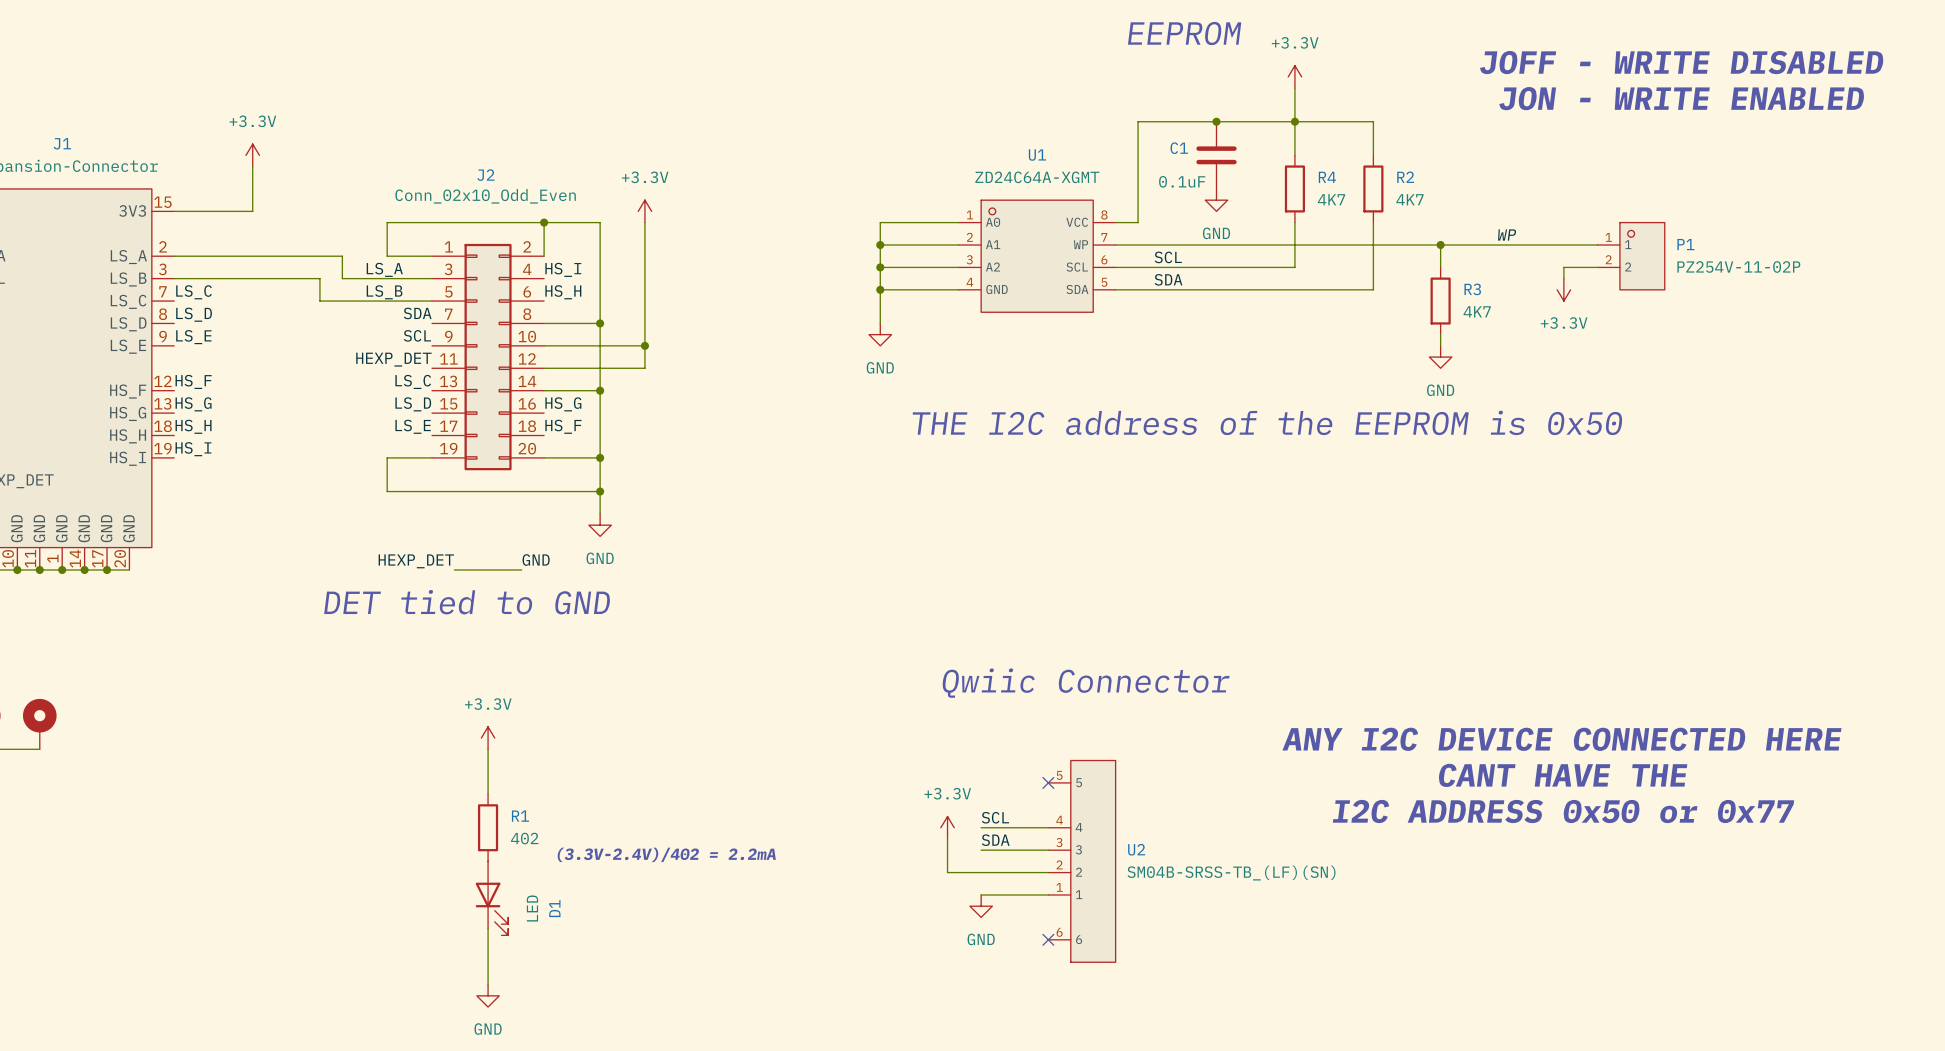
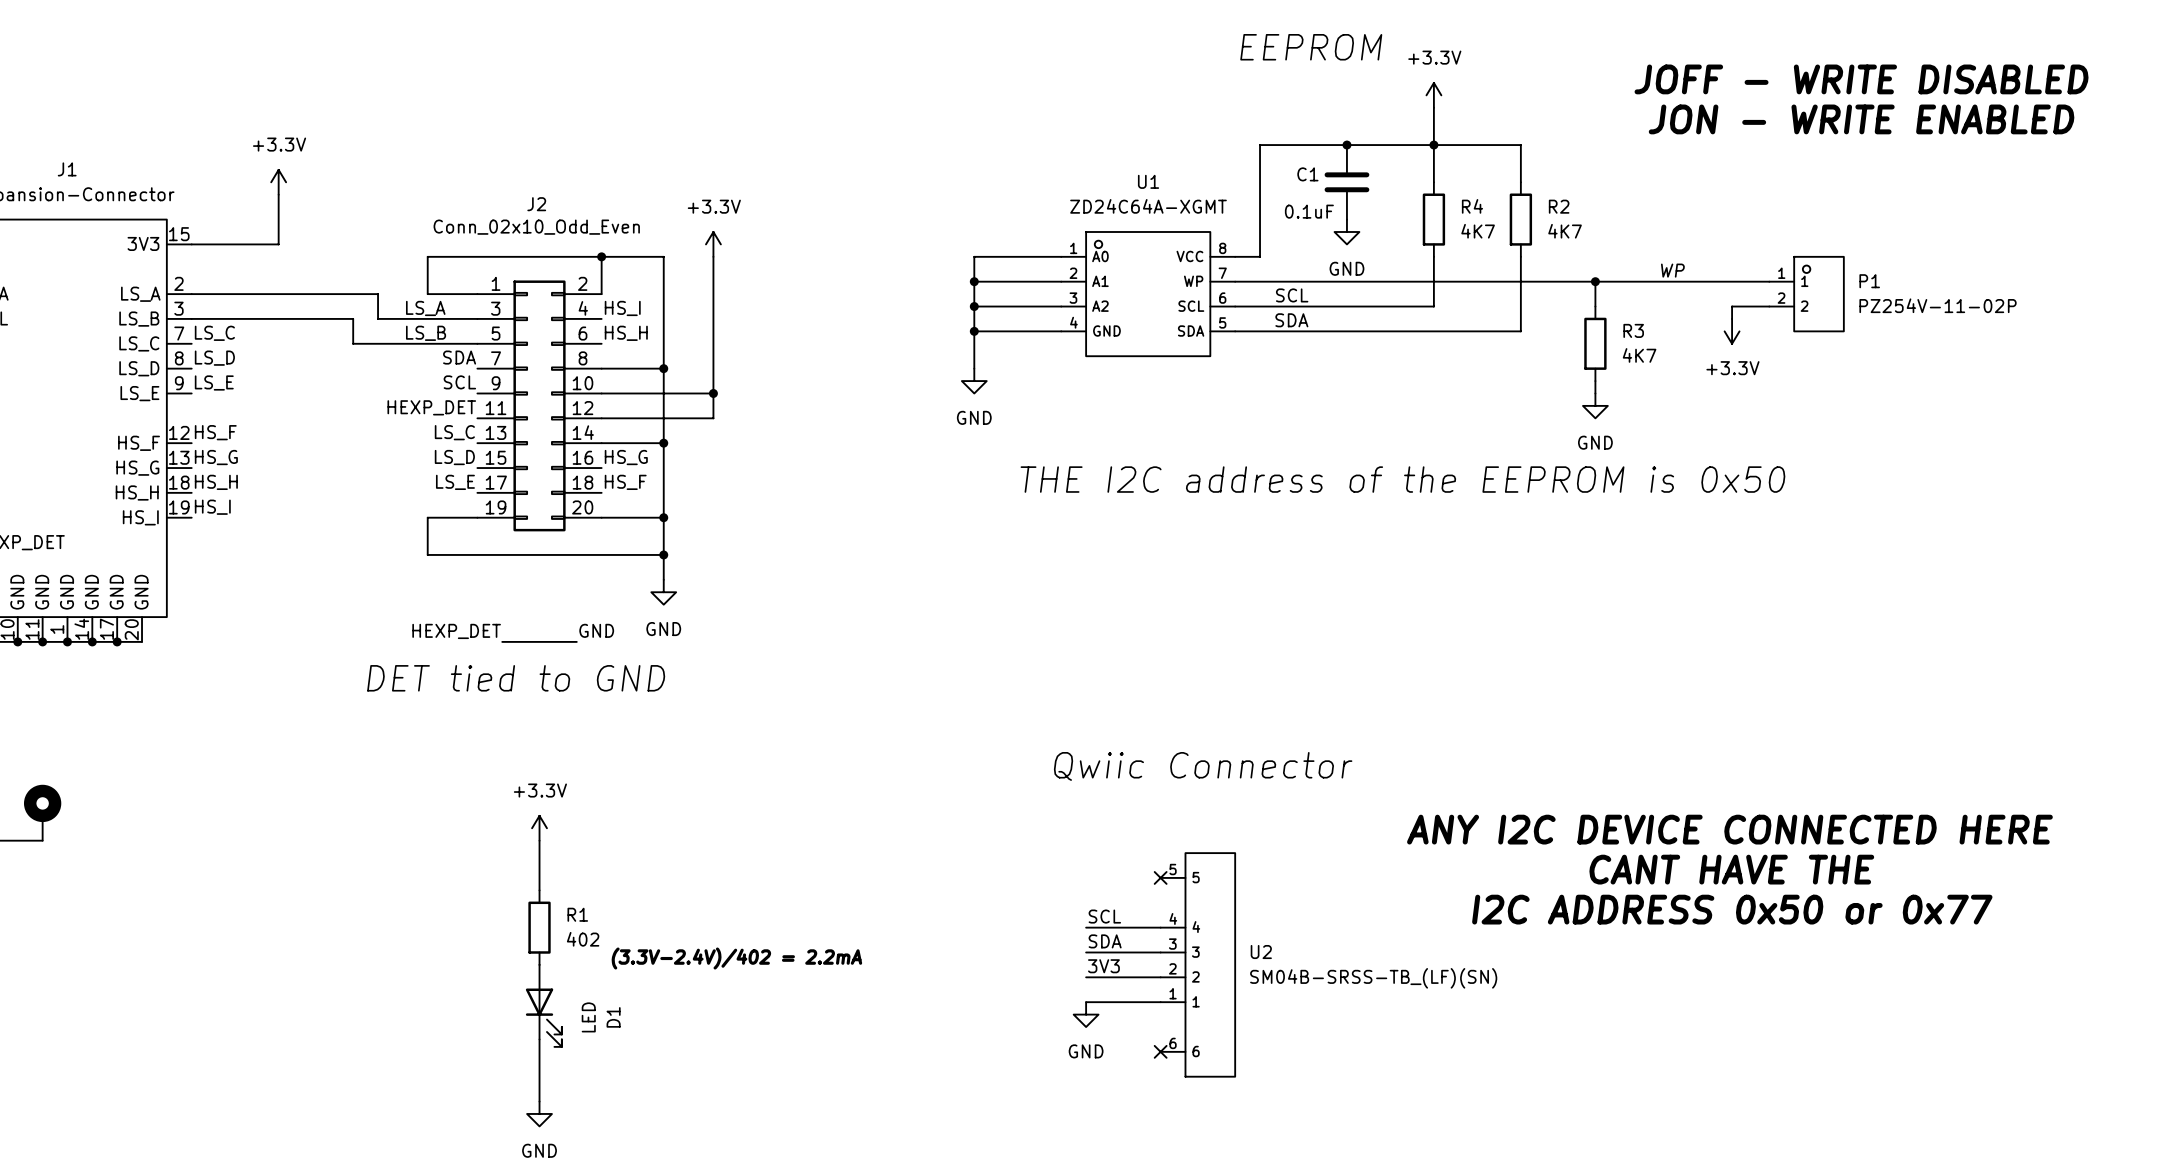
power symbol: +3.3V (947, 827) -> none
wire: (947, 838) (947, 872) (981, 872) -> none
label: none -> 3V3 (1103, 966)

